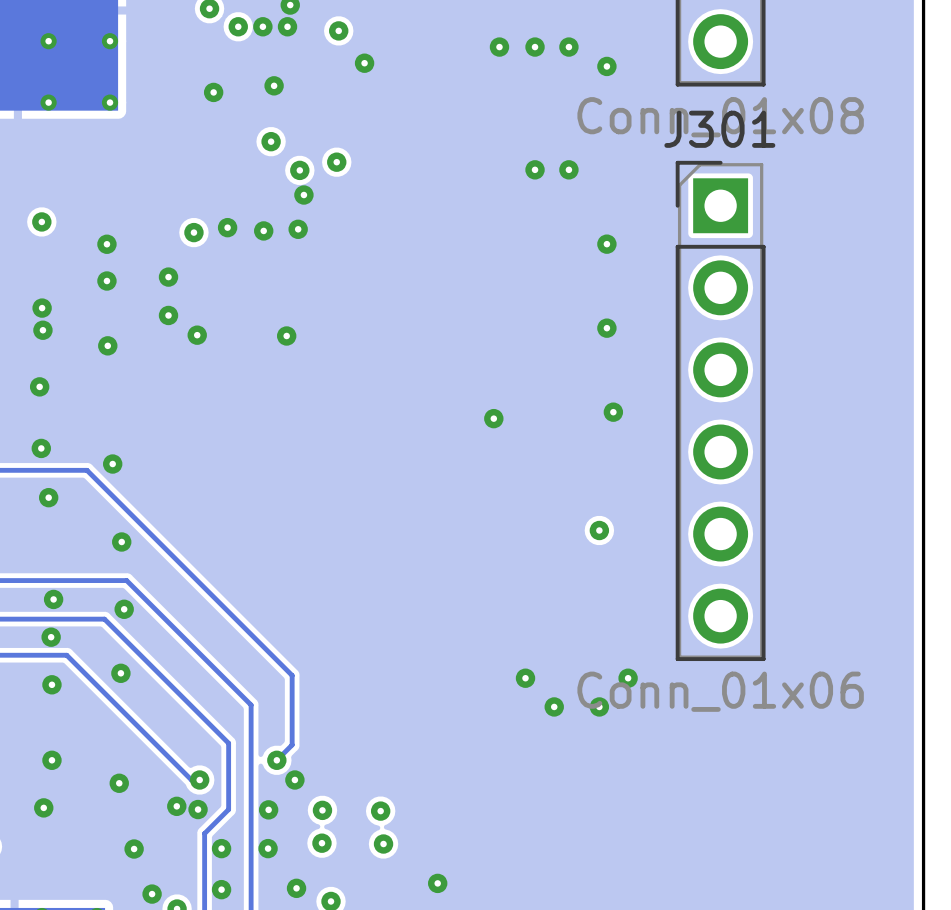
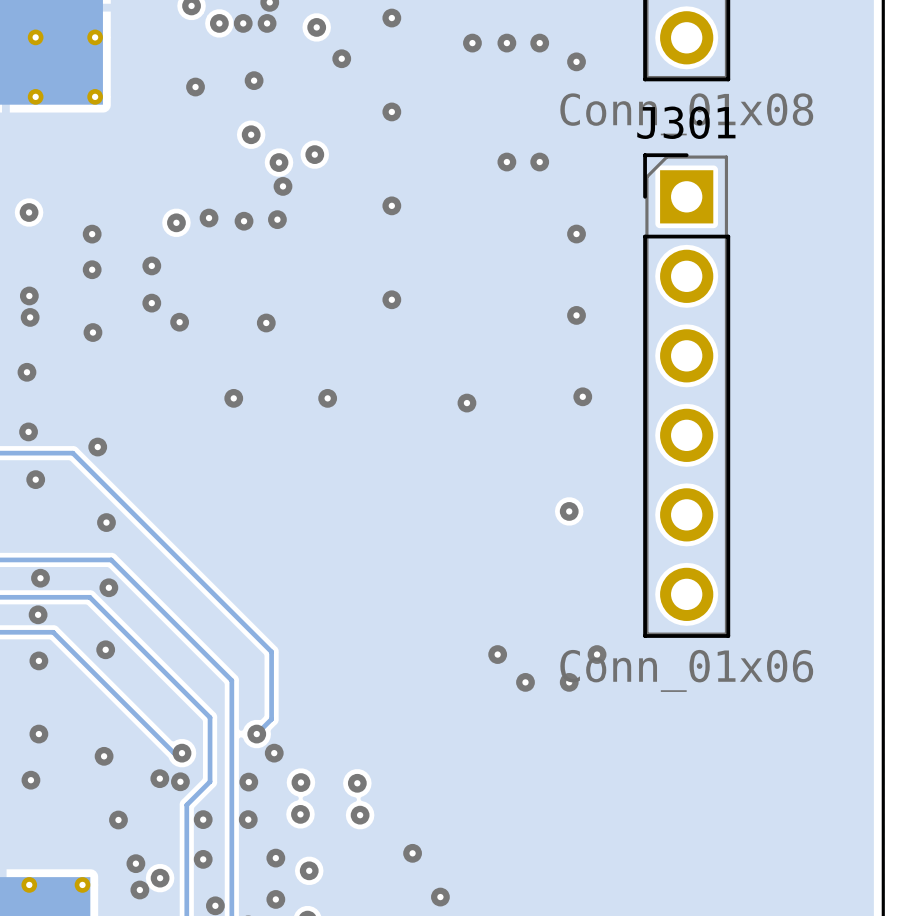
via: none -> (391, 18)
via: none -> (391, 111)
via: none -> (391, 205)
via: none -> (391, 299)
via: none -> (233, 398)
via: none -> (327, 398)

